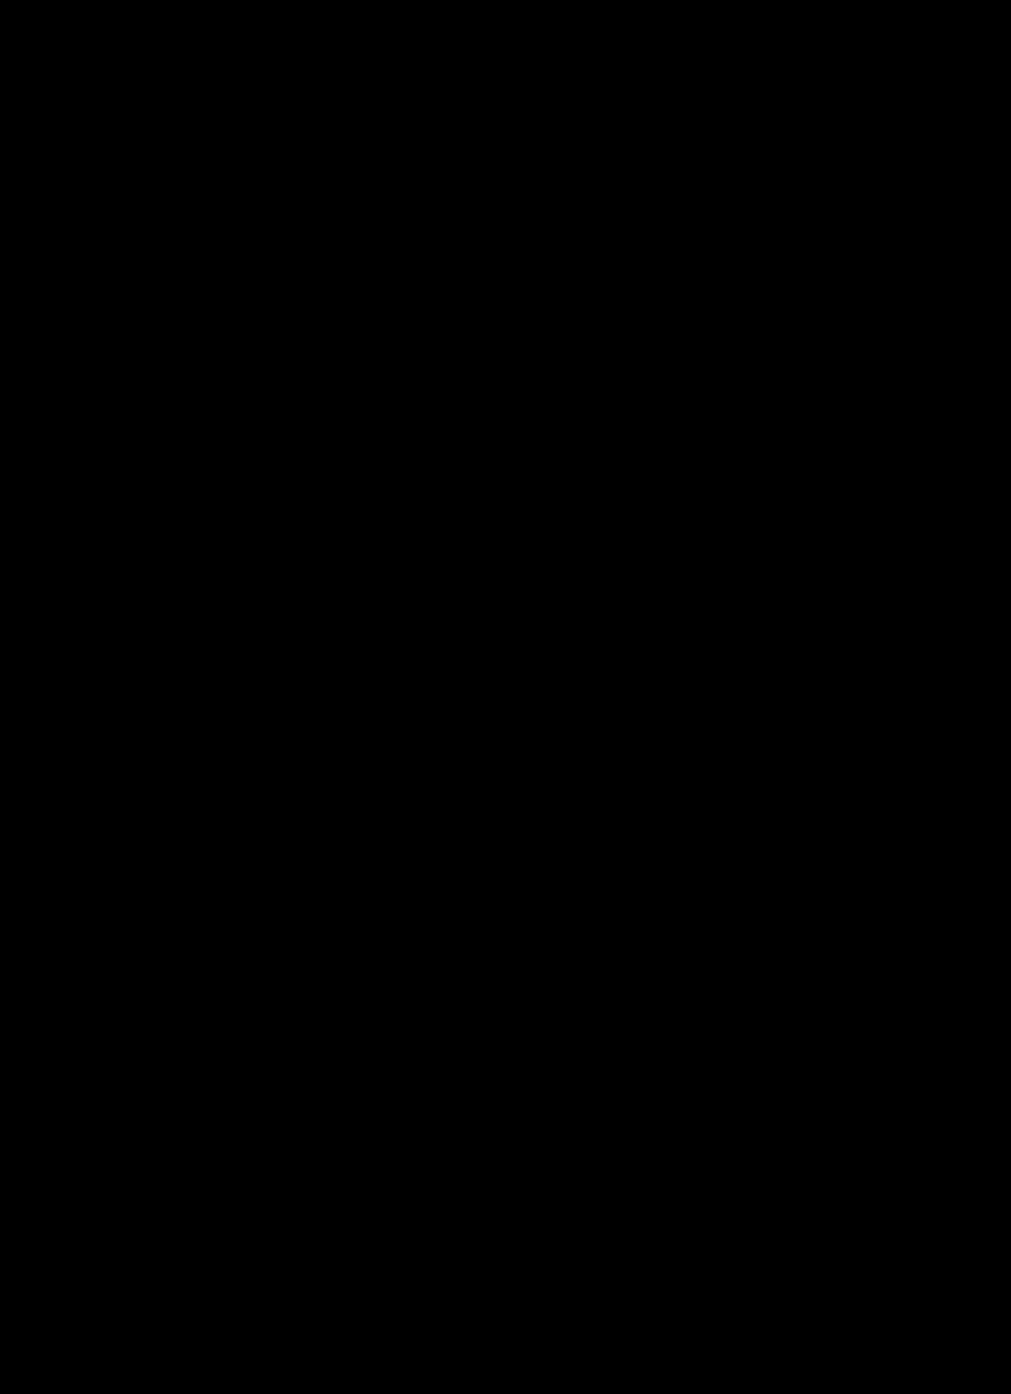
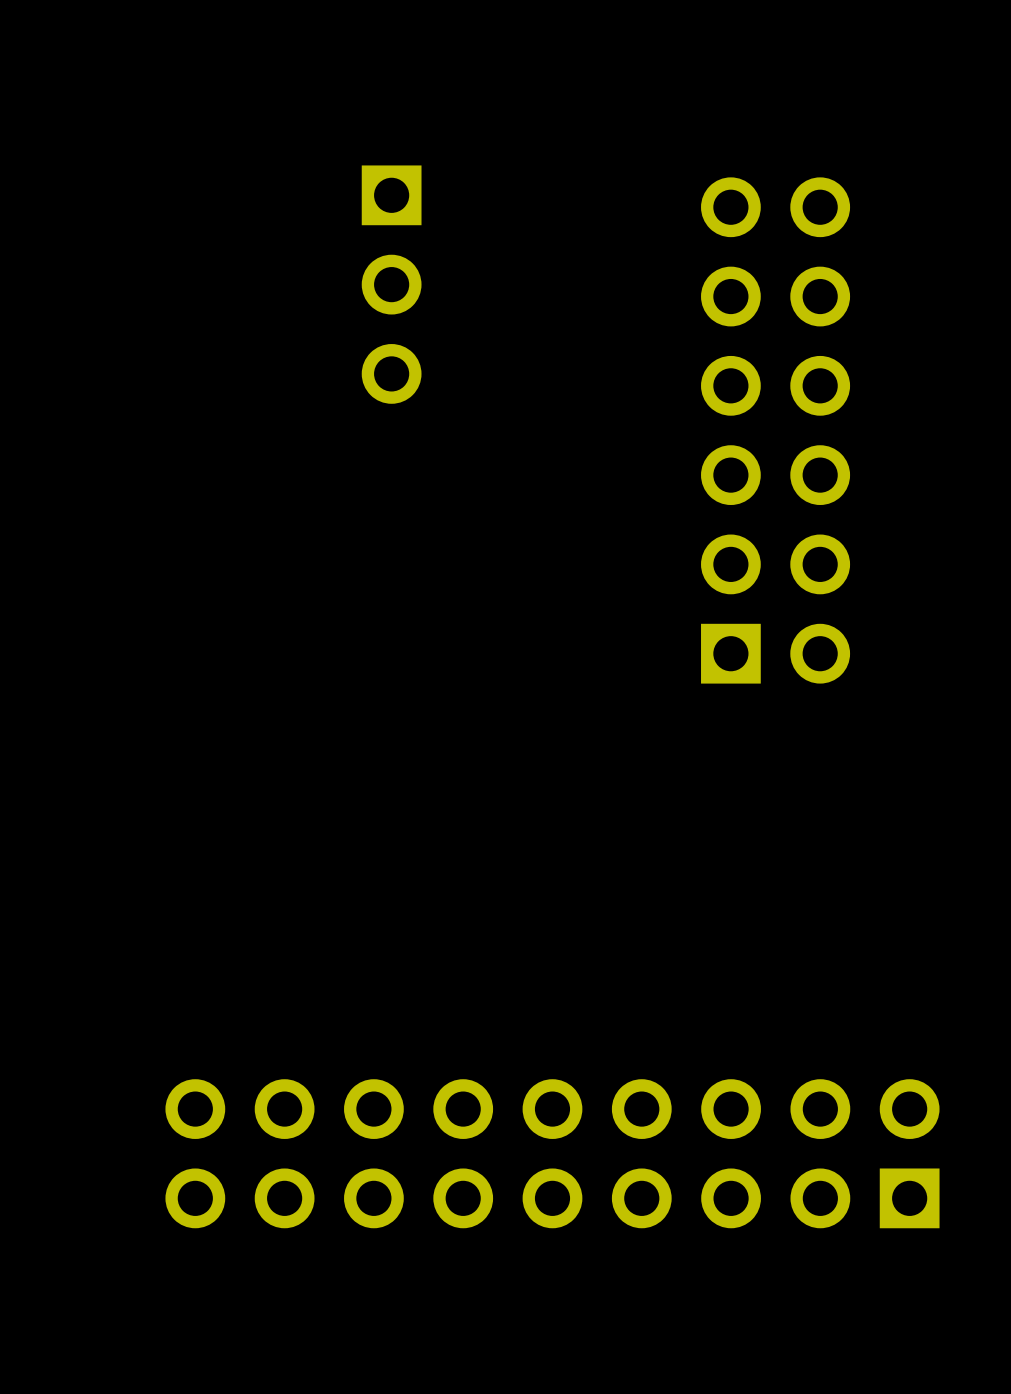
part: none -> (391, 284)
part: none -> (775, 430)
part: none -> (552, 1153)

